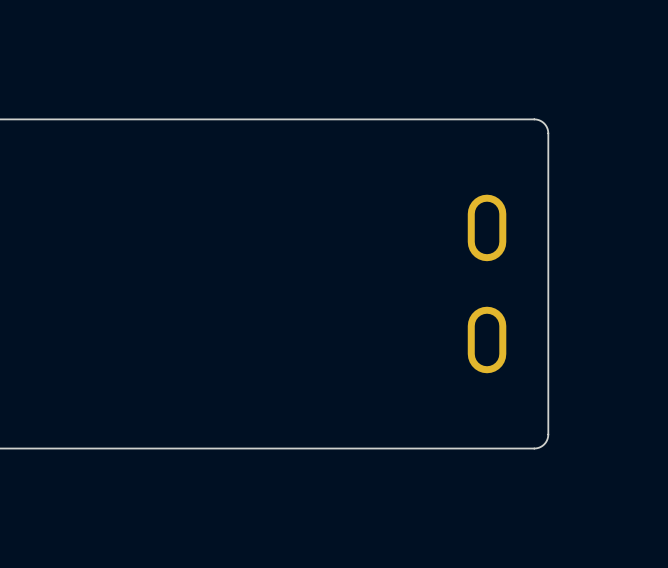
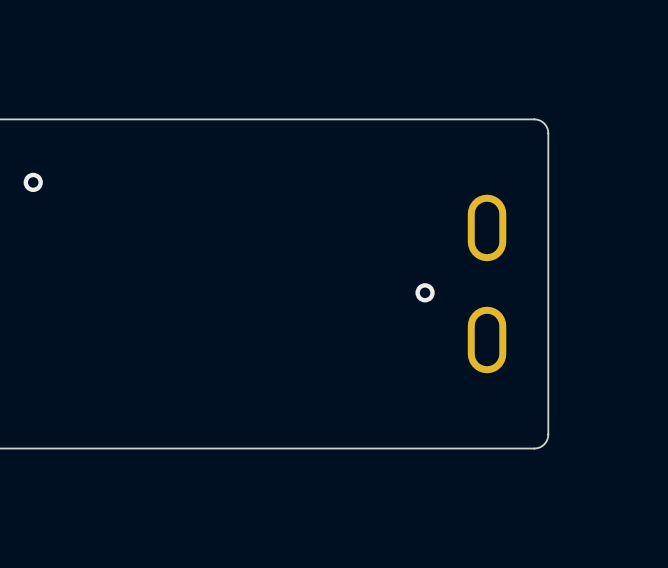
via: none -> (33, 182)
via: none -> (425, 292)

